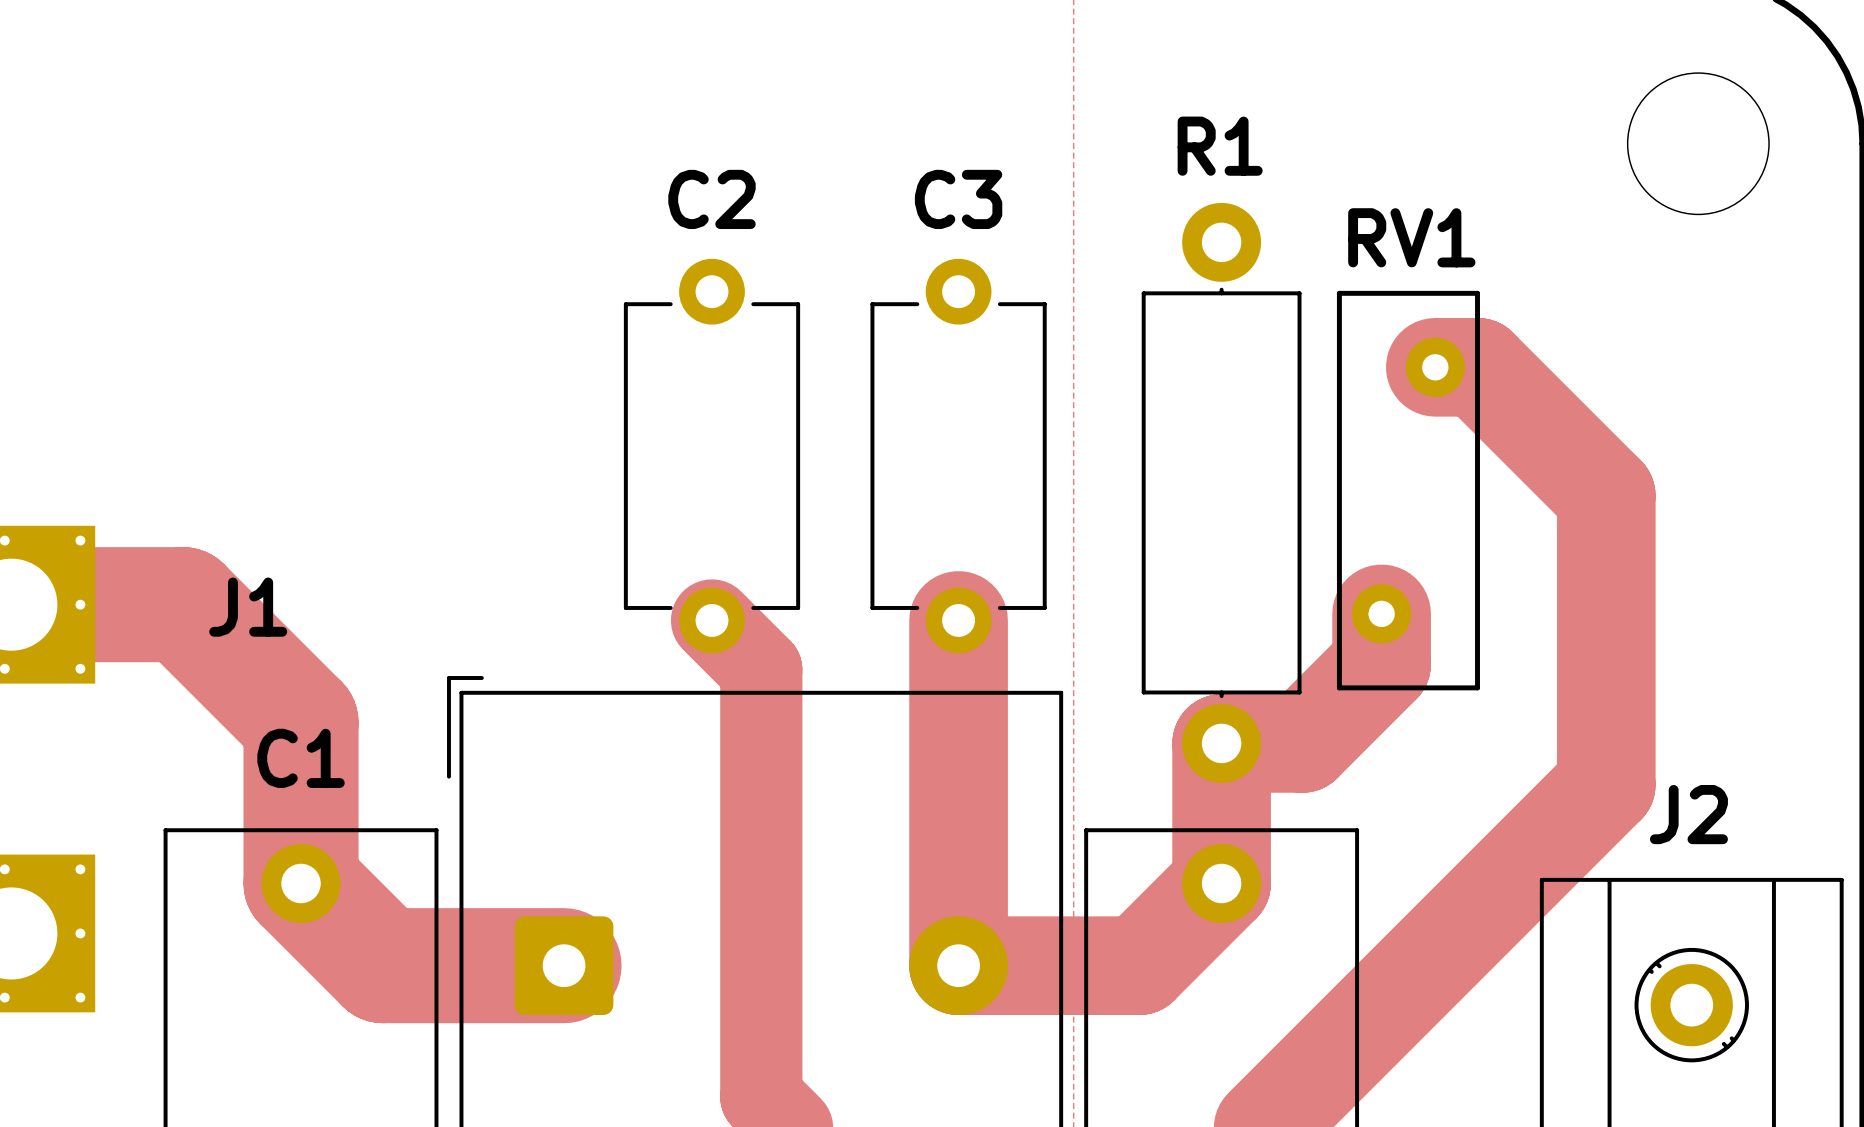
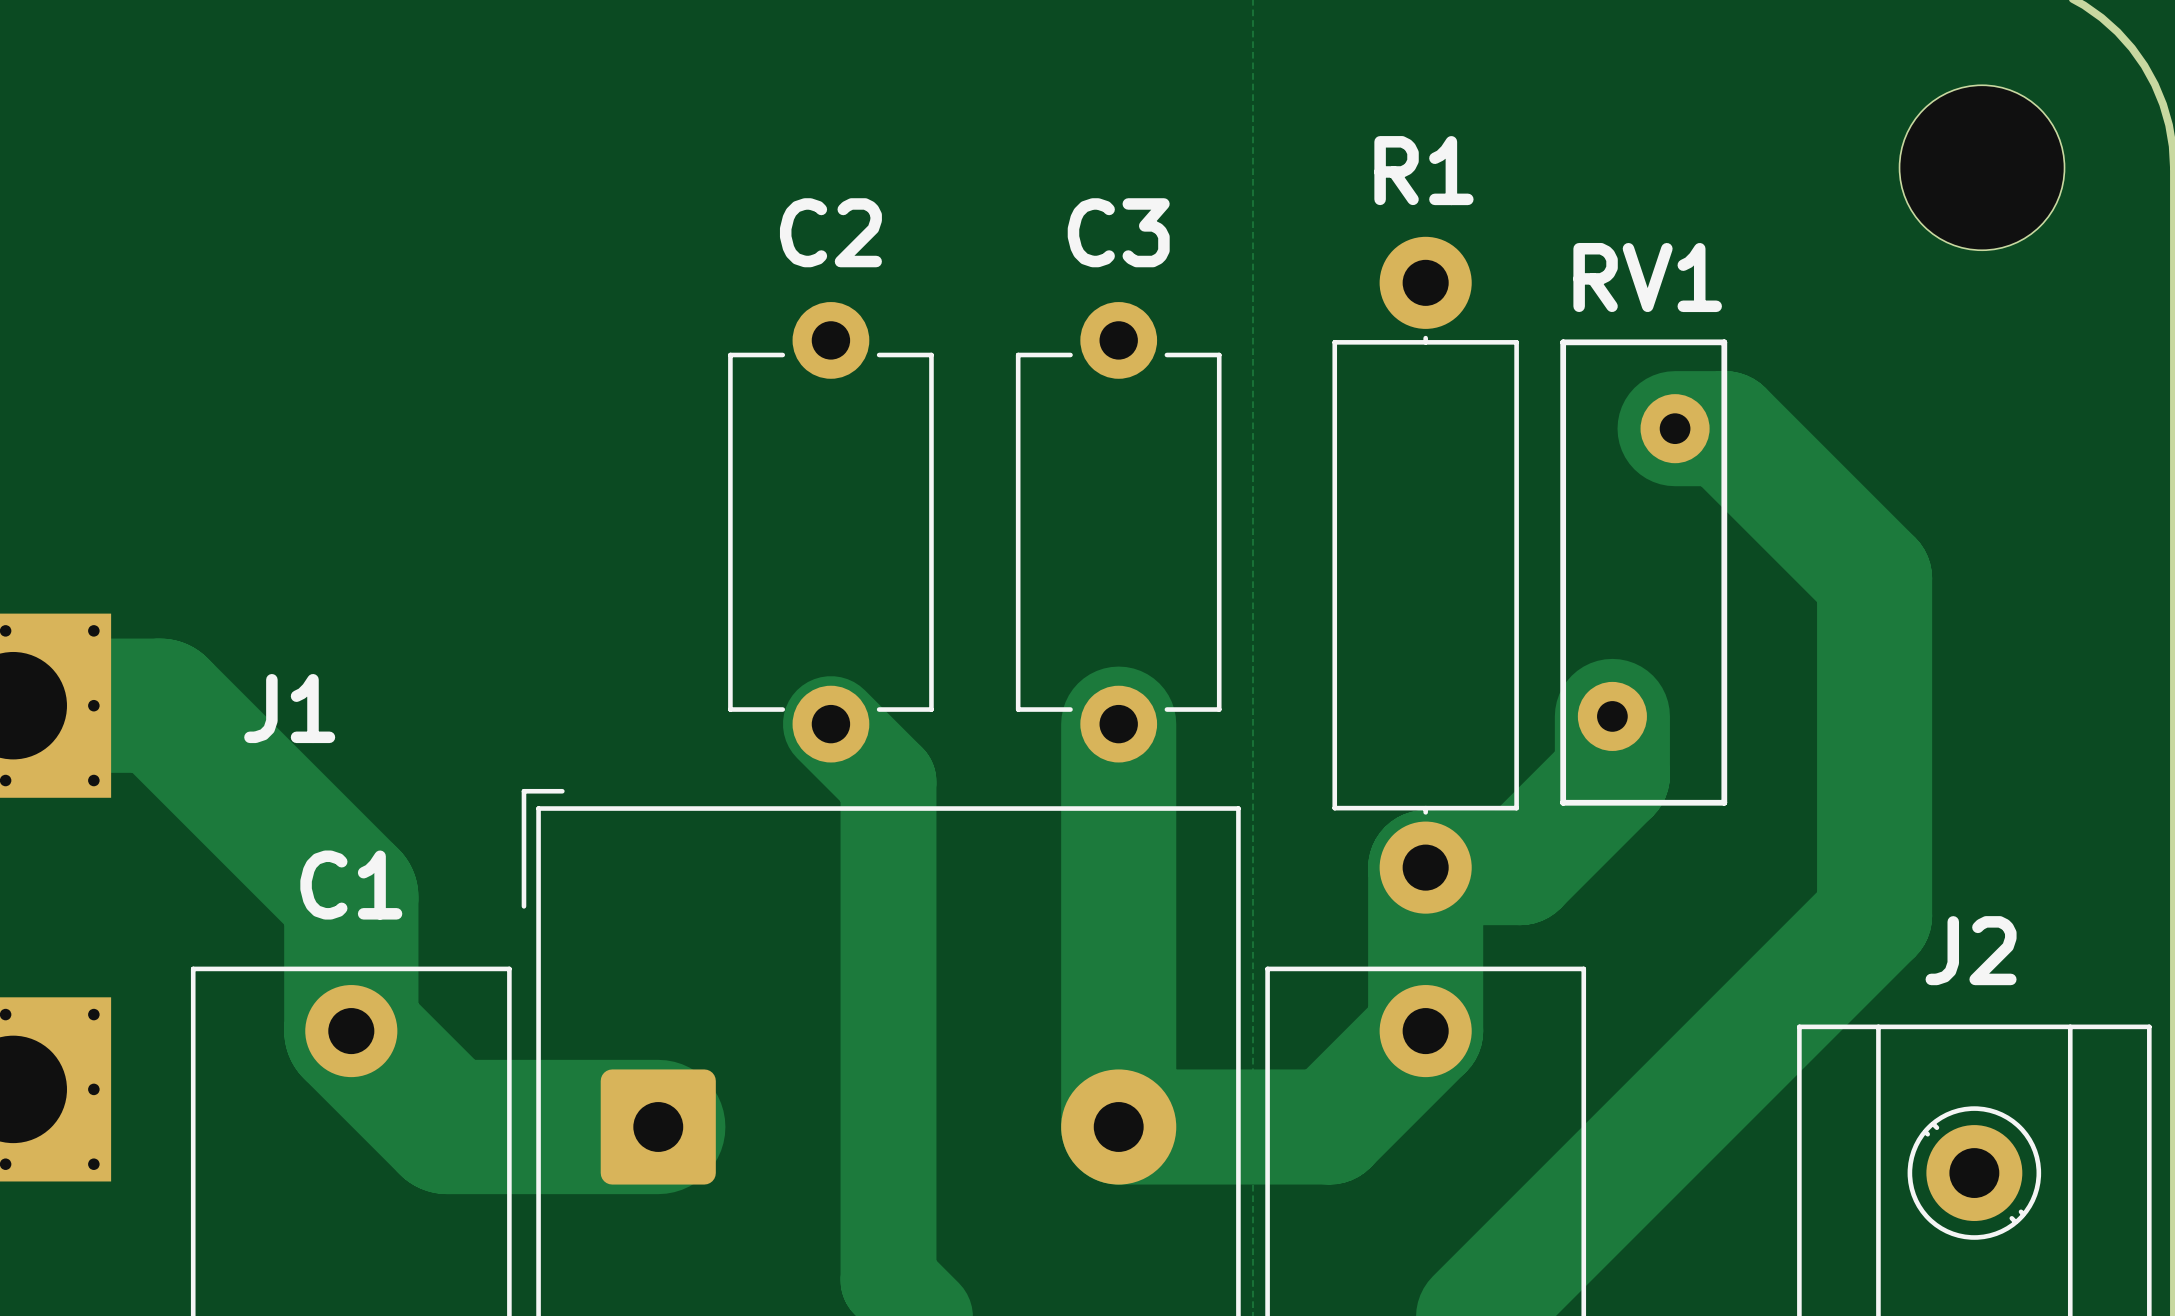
track: (137, 604) (183, 604) (301, 722) (301, 768) -> (160, 705) (351, 896)

